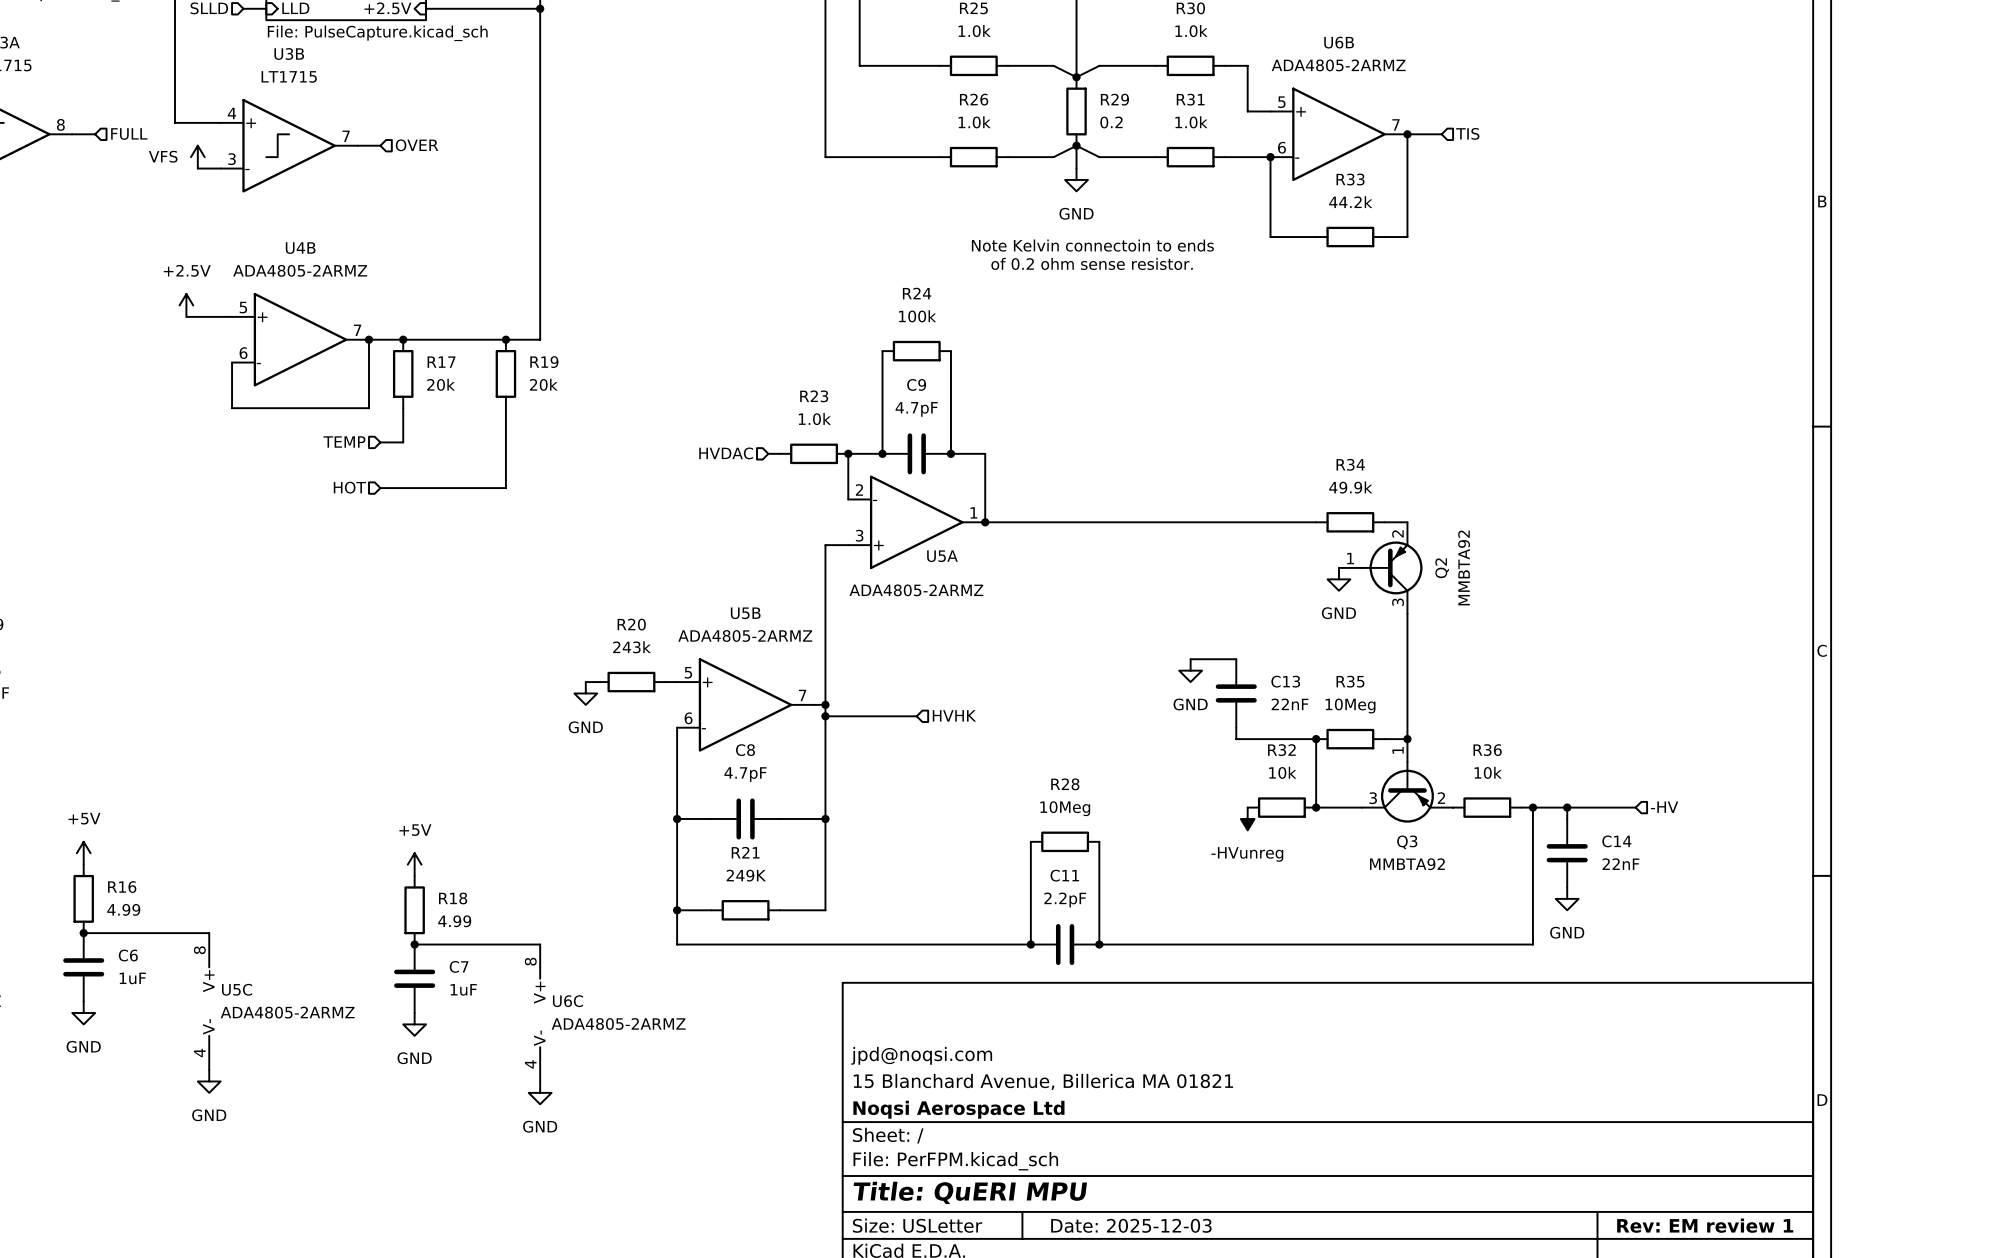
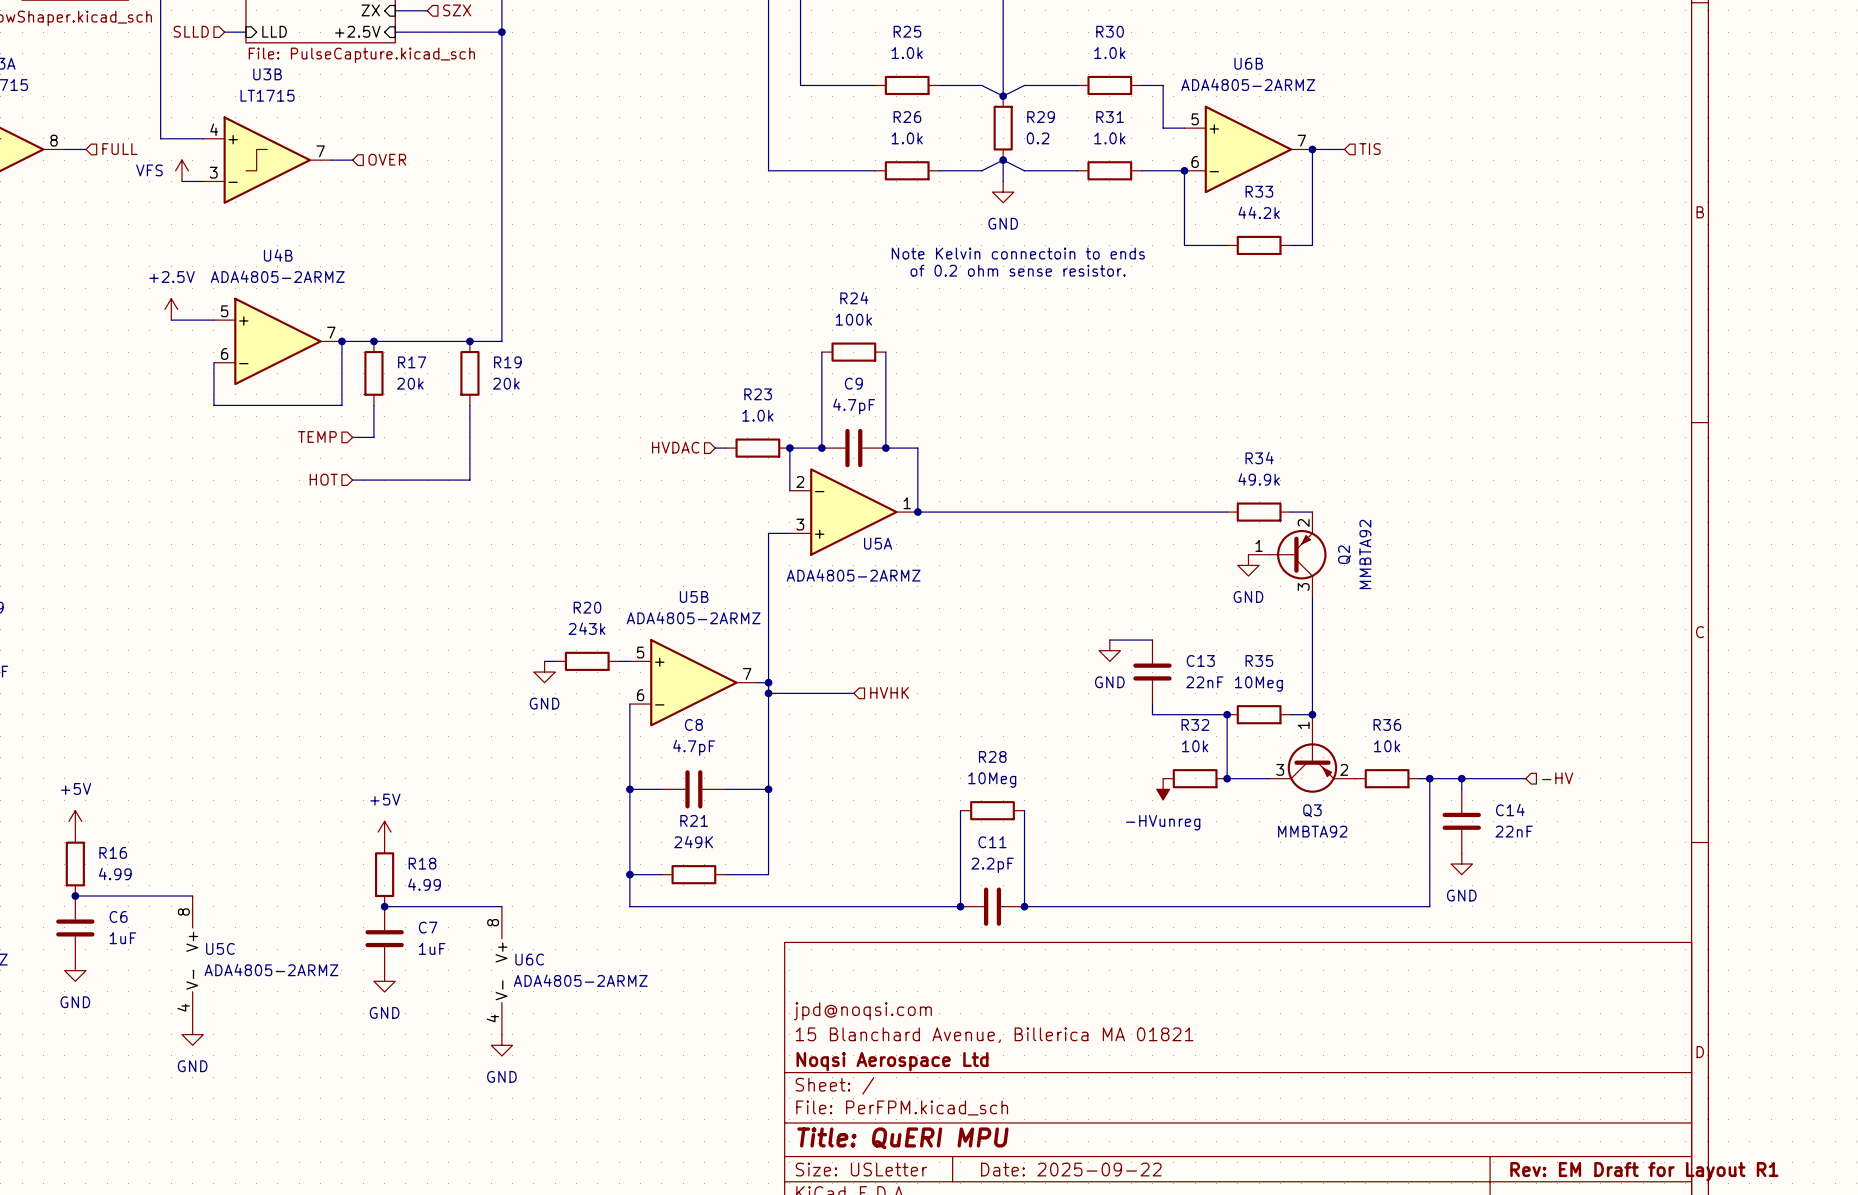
title block: Date: 2025-12-03 (1131, 1225) -> Date: 2025-09-22 (1071, 1169)
title block: Rev: EM review 1 (1705, 1225) -> Rev: EM Draft for Layout R1 (1644, 1171)

